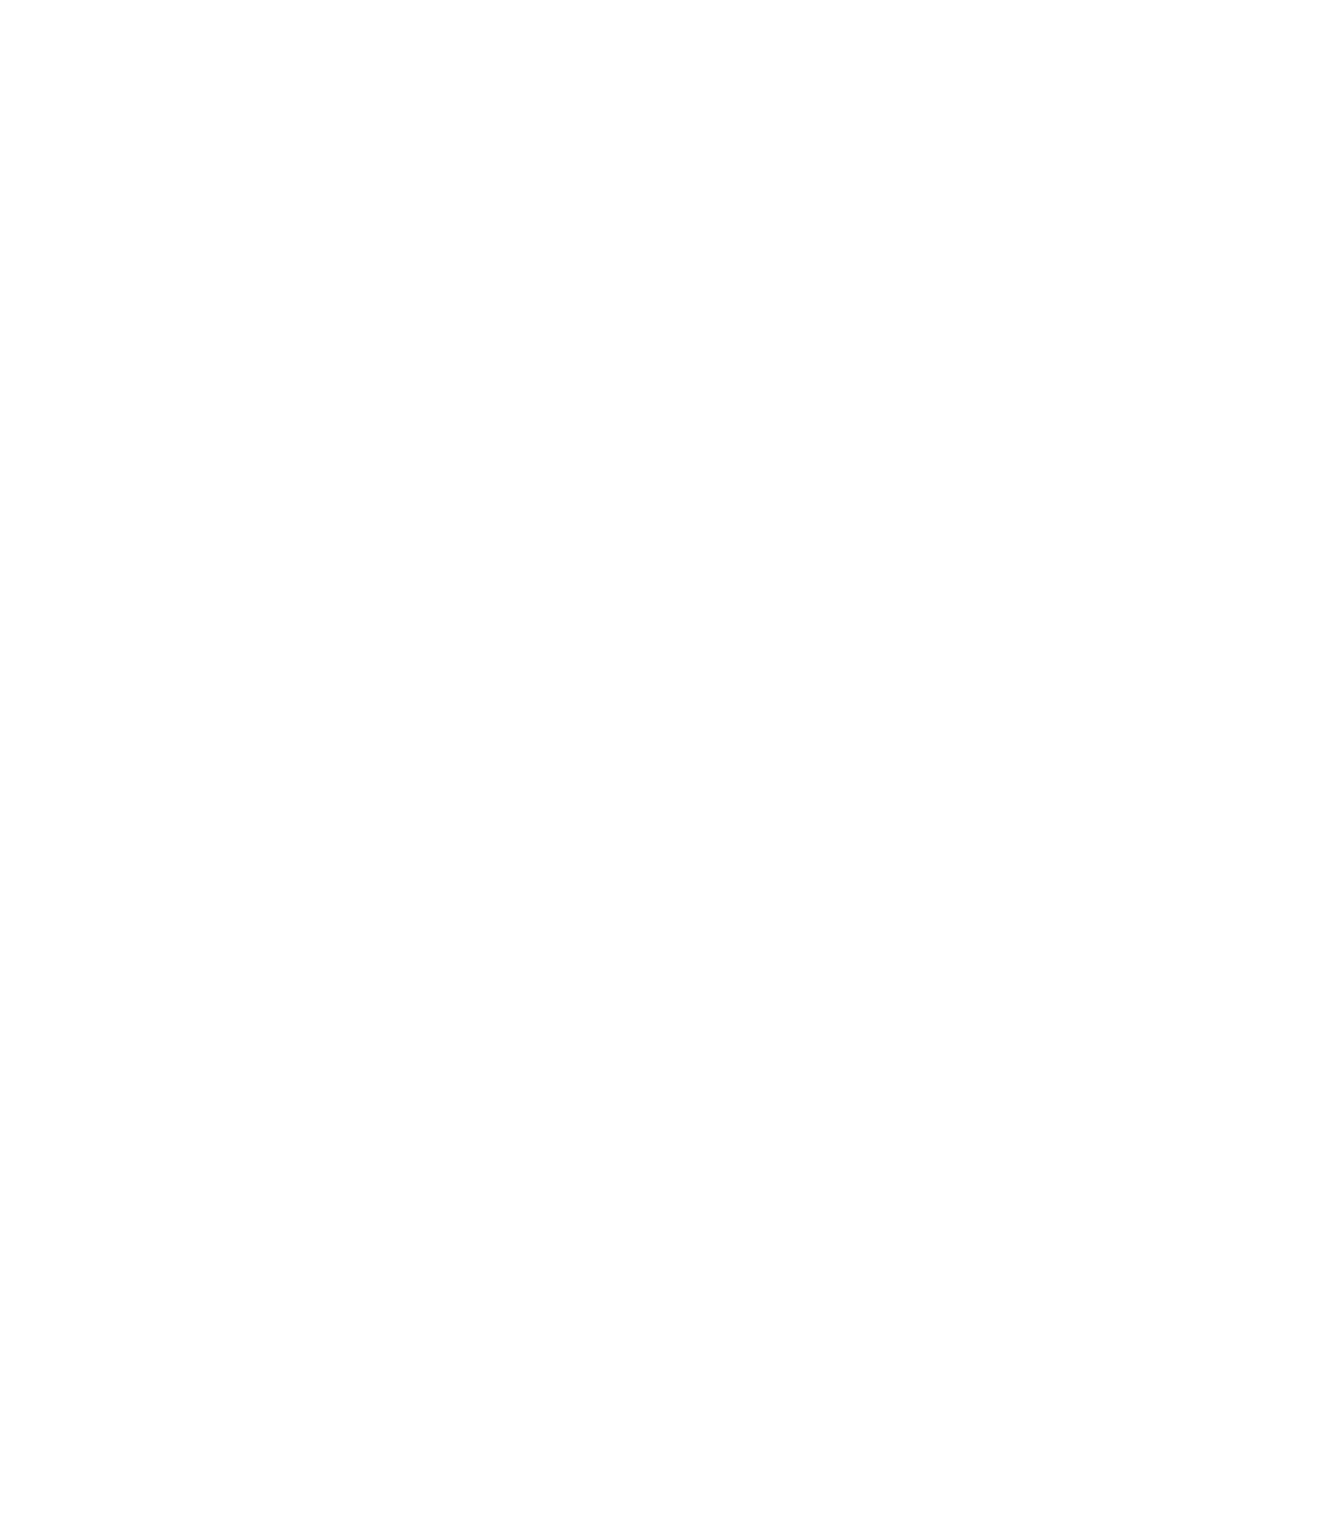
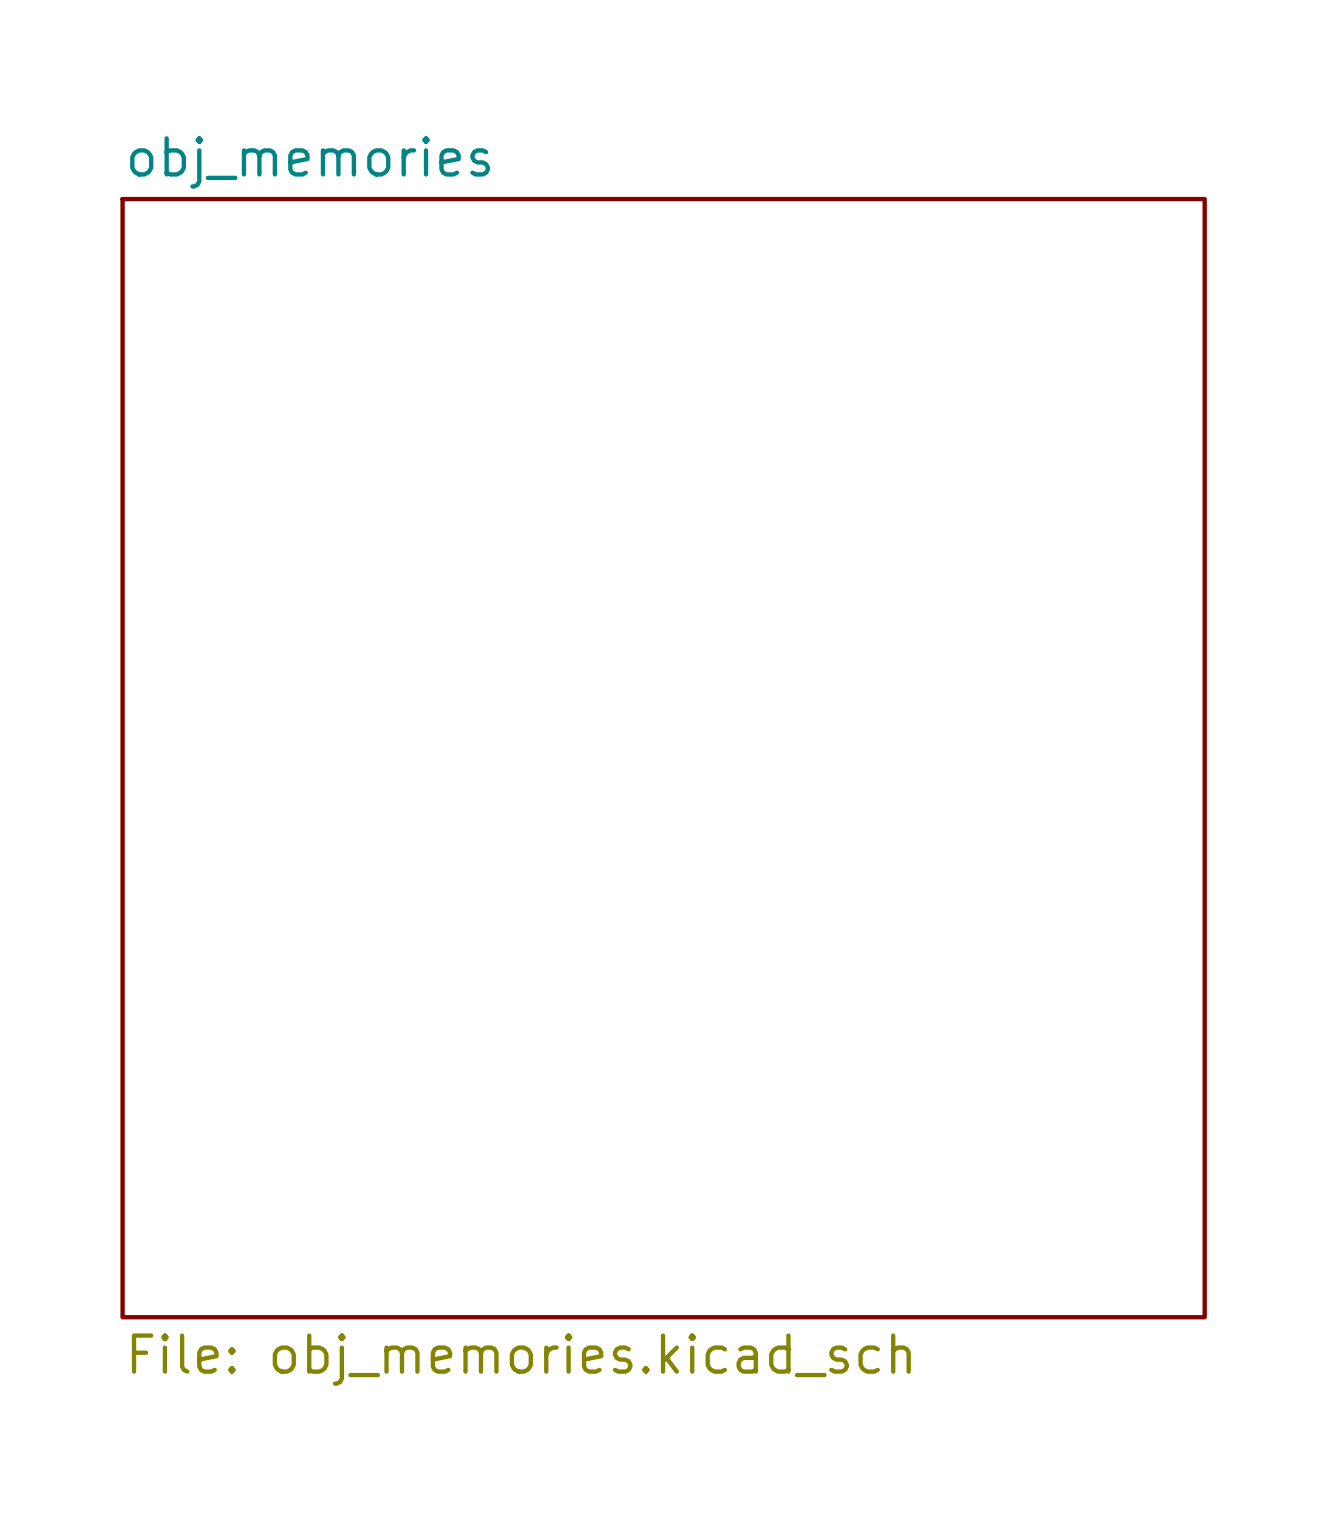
sheet obj_memories: none -> File: obj_memories.kicad_sch (663, 758)

